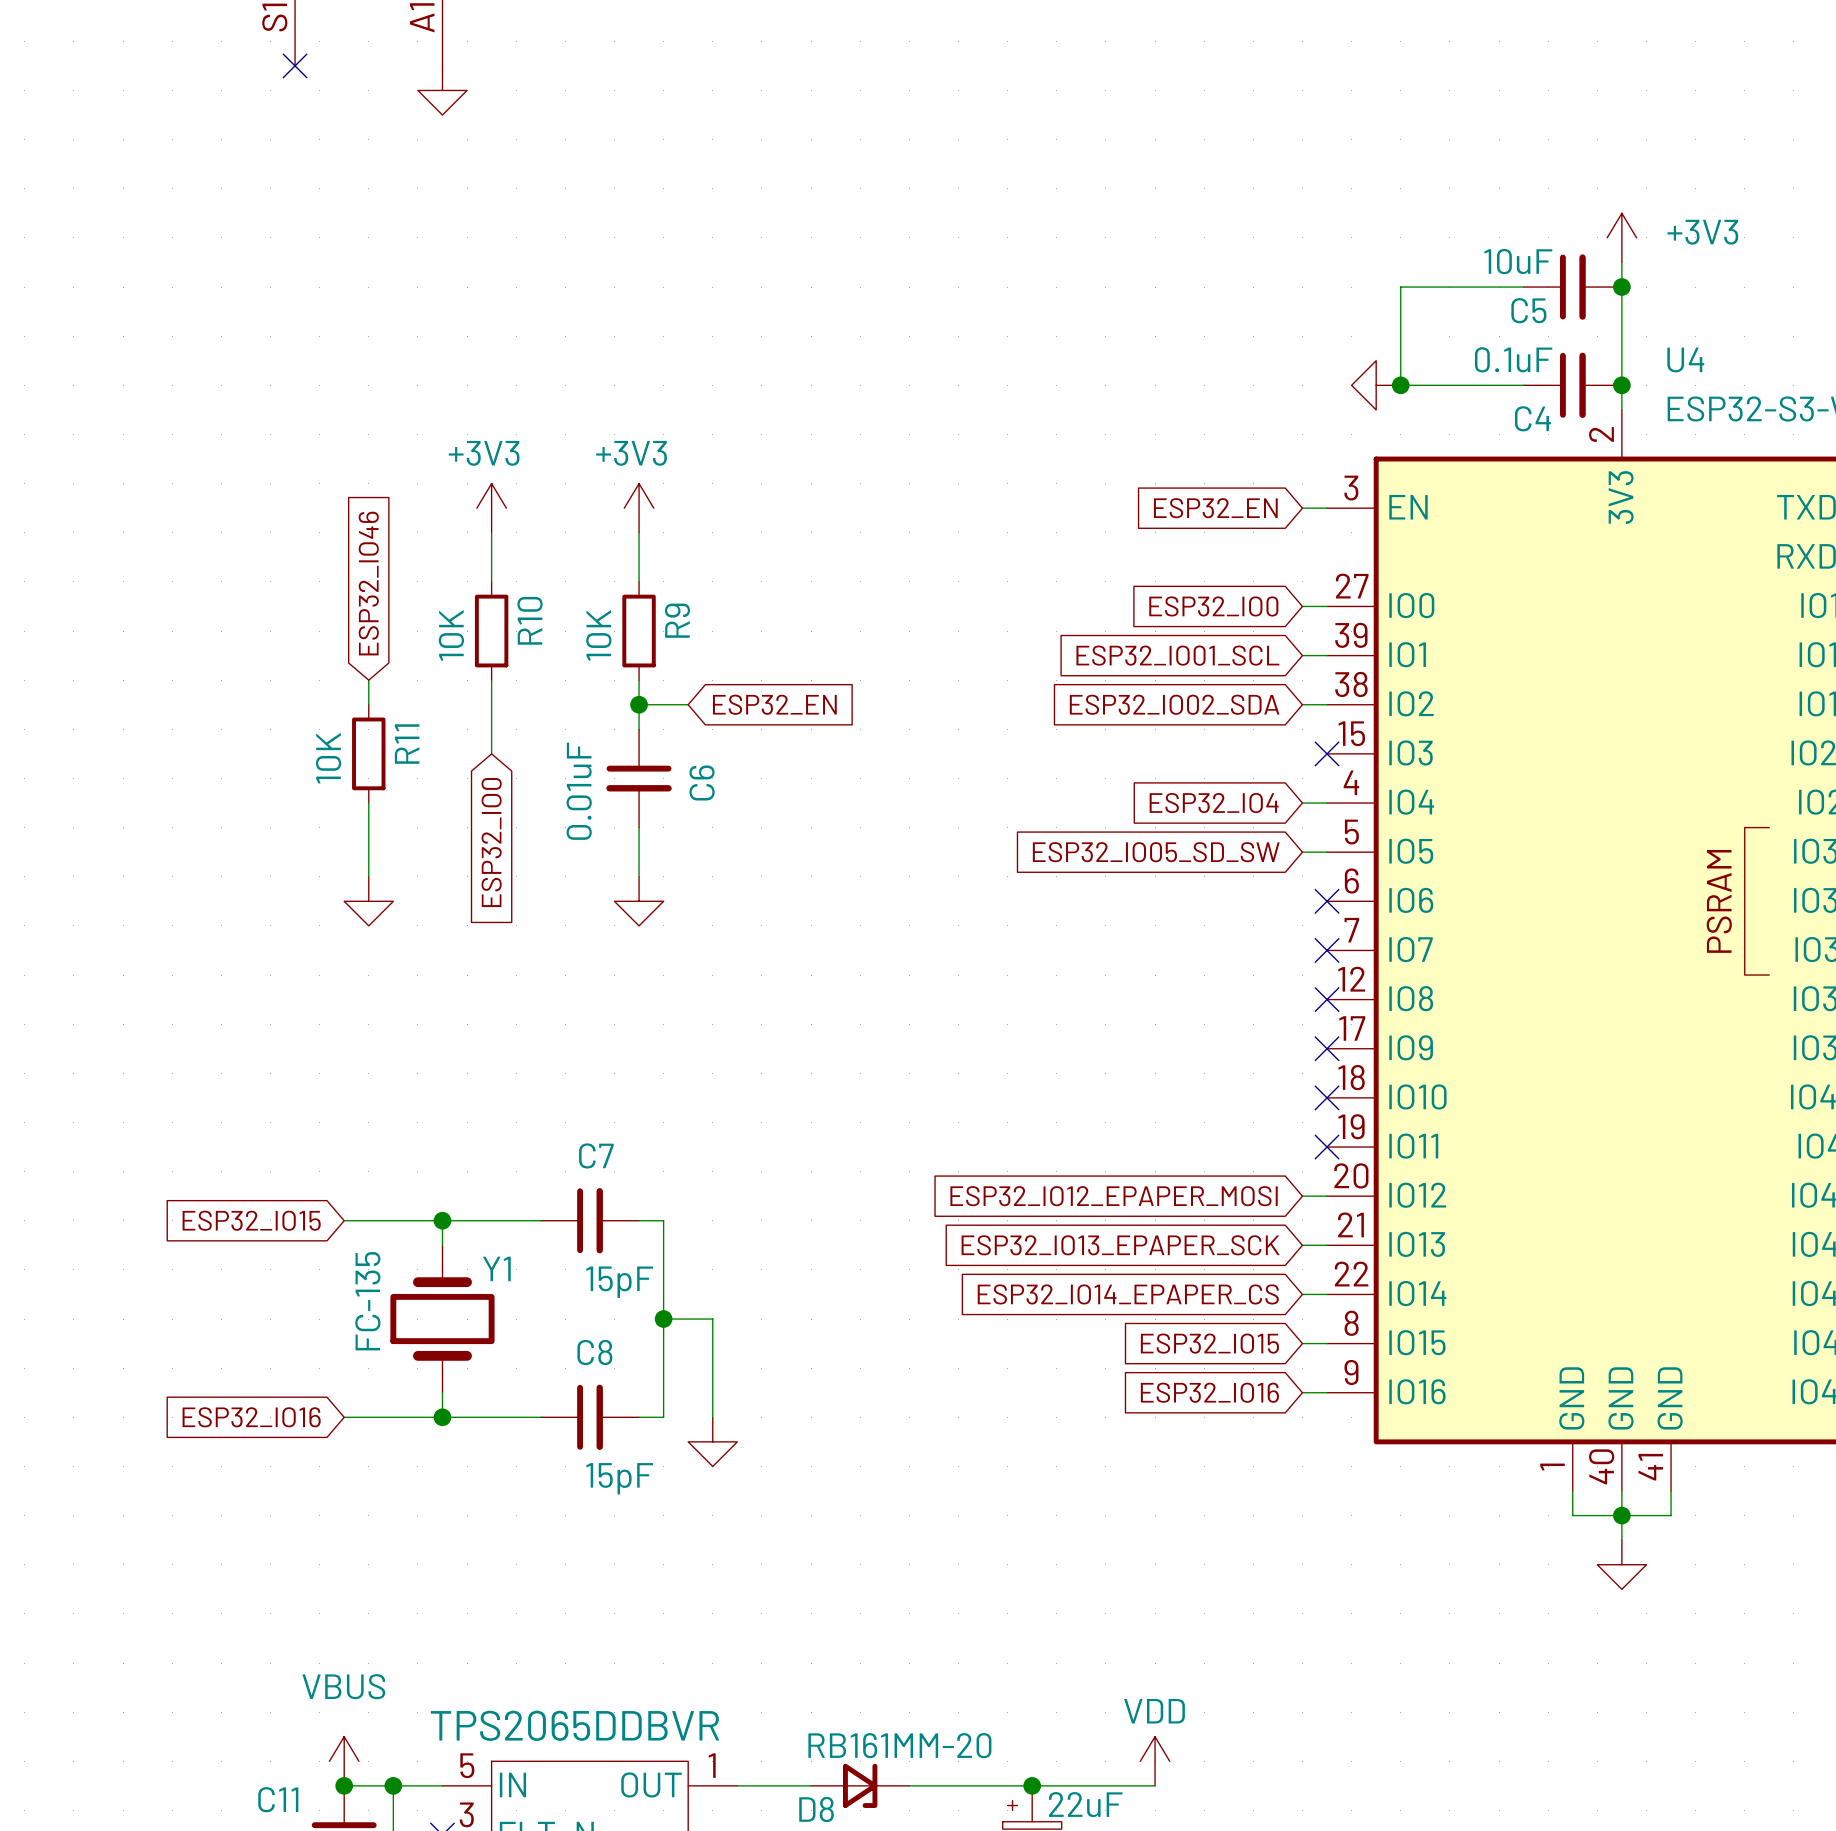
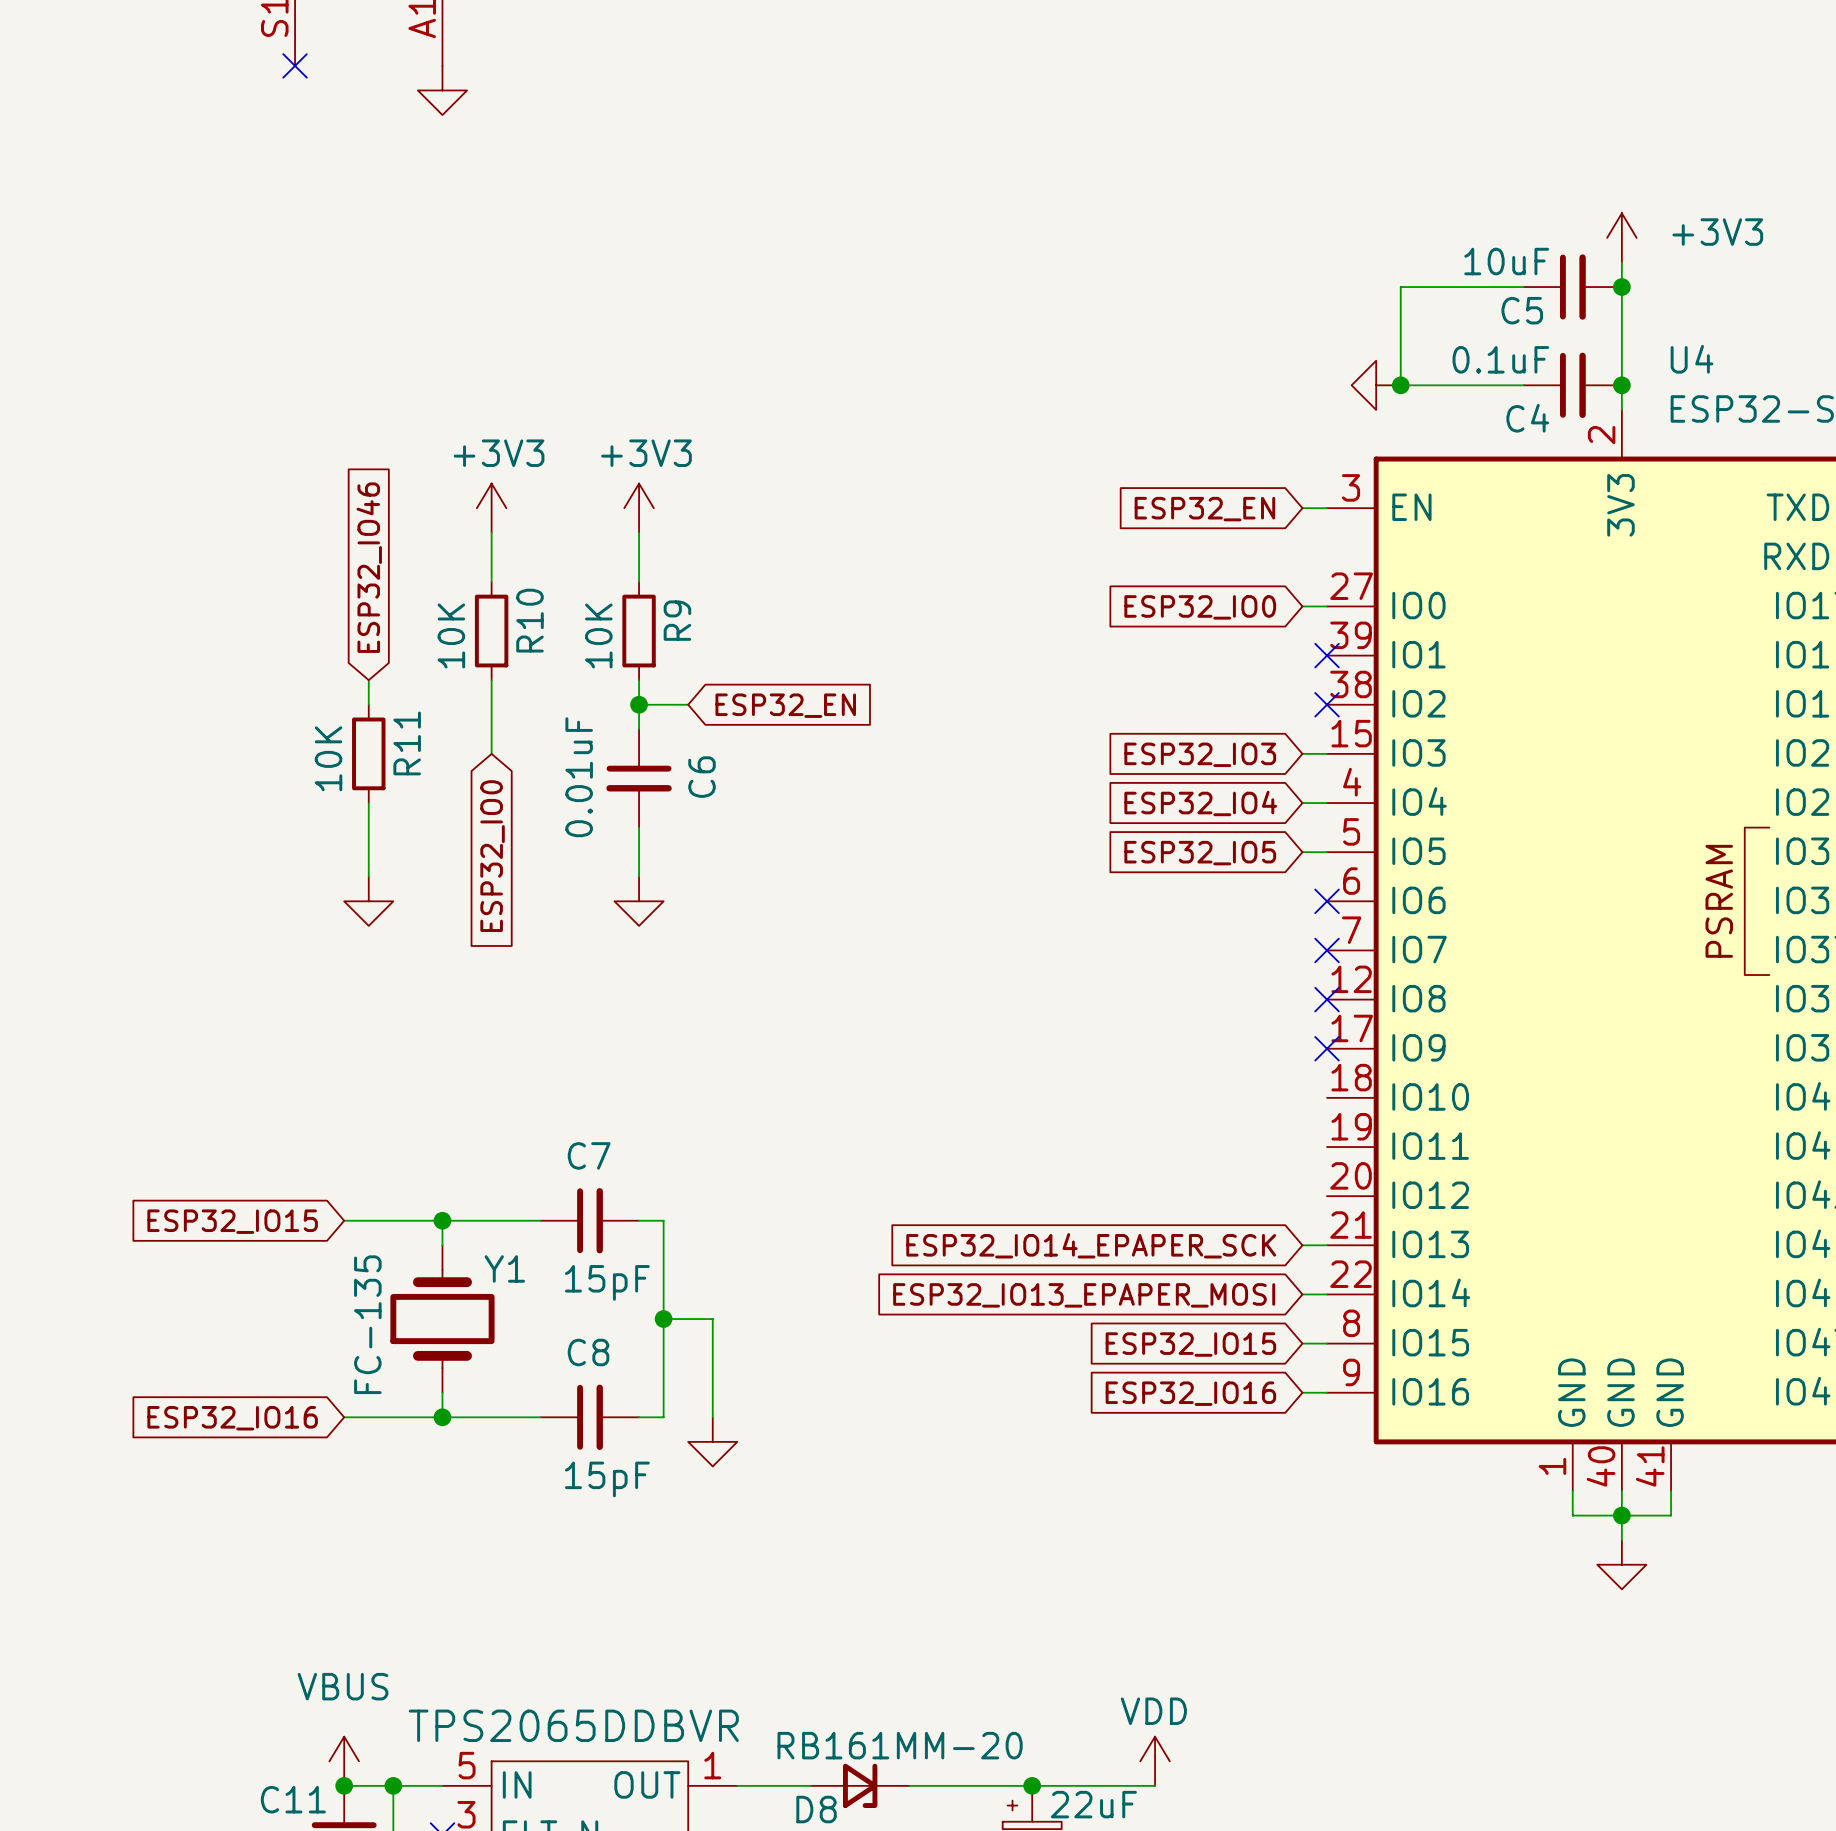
global label: ESP32_IO01_SCL (1177, 655) -> none
wire: (1302, 655) (1327, 655) -> none
no-connect mark: none -> (1327, 655)
global label: ESP32_IO02_SDA (1174, 704) -> none
wire: (1302, 704) (1327, 704) -> (1302, 753) (1327, 753)
no-connect mark: none -> (1327, 704)
global label: none -> ESP32_IO3 (1200, 754)
no-connect mark: (1327, 753) -> none
global label: ESP32_IO05_SD_SW (1156, 852) -> ESP32_IO5 (1200, 853)
no-connect mark: (1327, 1097) -> none
no-connect mark: (1327, 1147) -> none
global label: ESP32_IO12_EPAPER_MOSI (1114, 1196) -> none
wire: (1302, 1196) (1327, 1196) -> none
global label: ESP32_IO13_EPAPER_SCK (1120, 1245) -> ESP32_IO14_EPAPER_SCK (1091, 1245)
global label: ESP32_IO14_EPAPER_CS (1128, 1294) -> ESP32_IO13_EPAPER_MOSI (1084, 1295)

